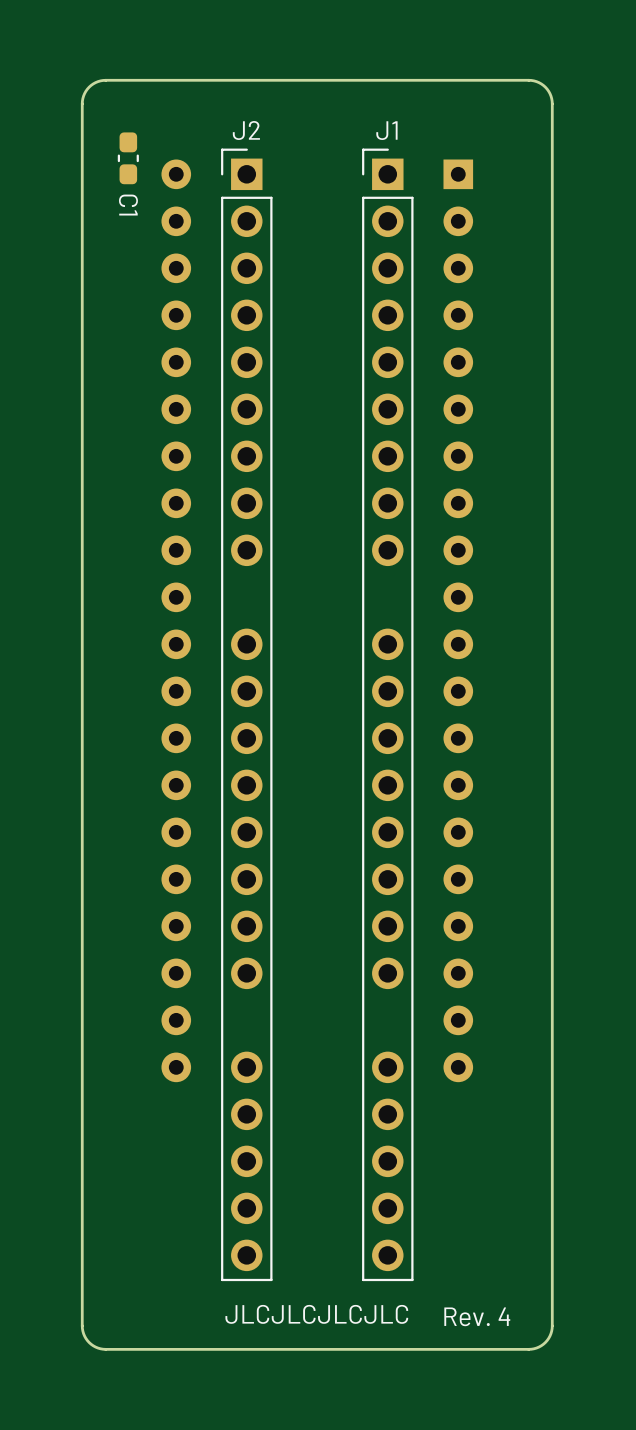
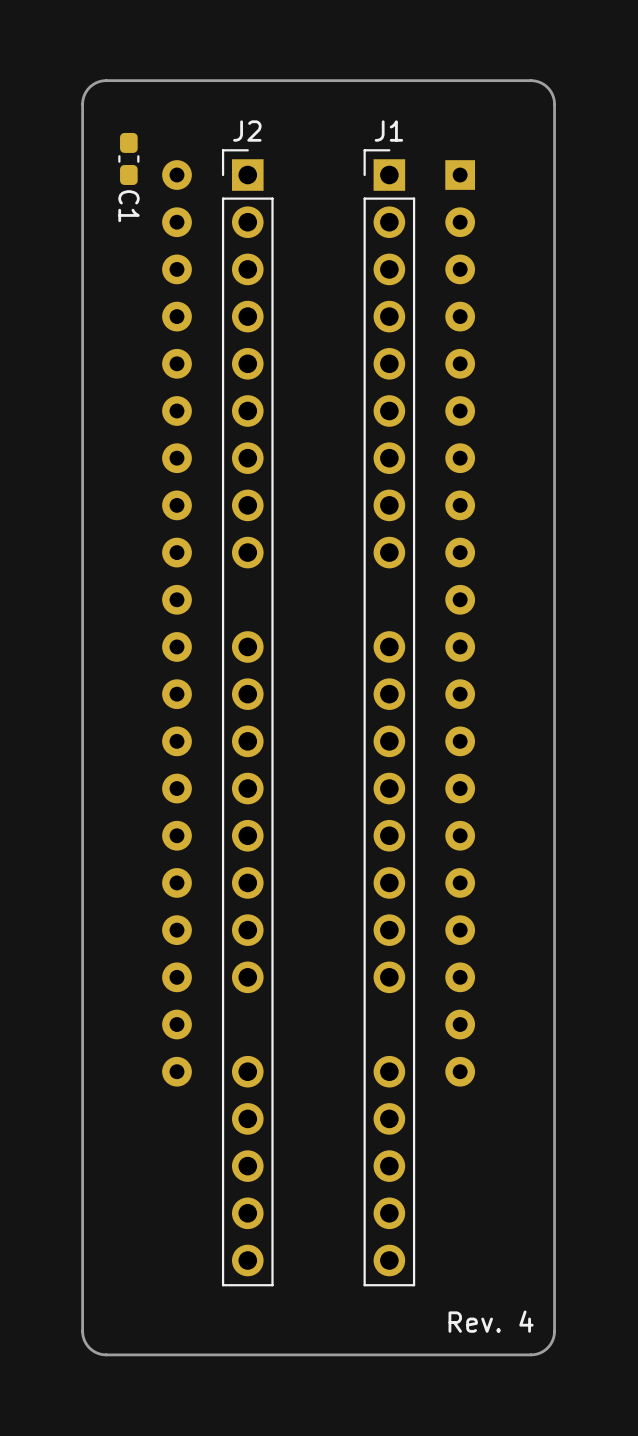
text: JLCJLCJLCJLC (316, 1314) -> none

